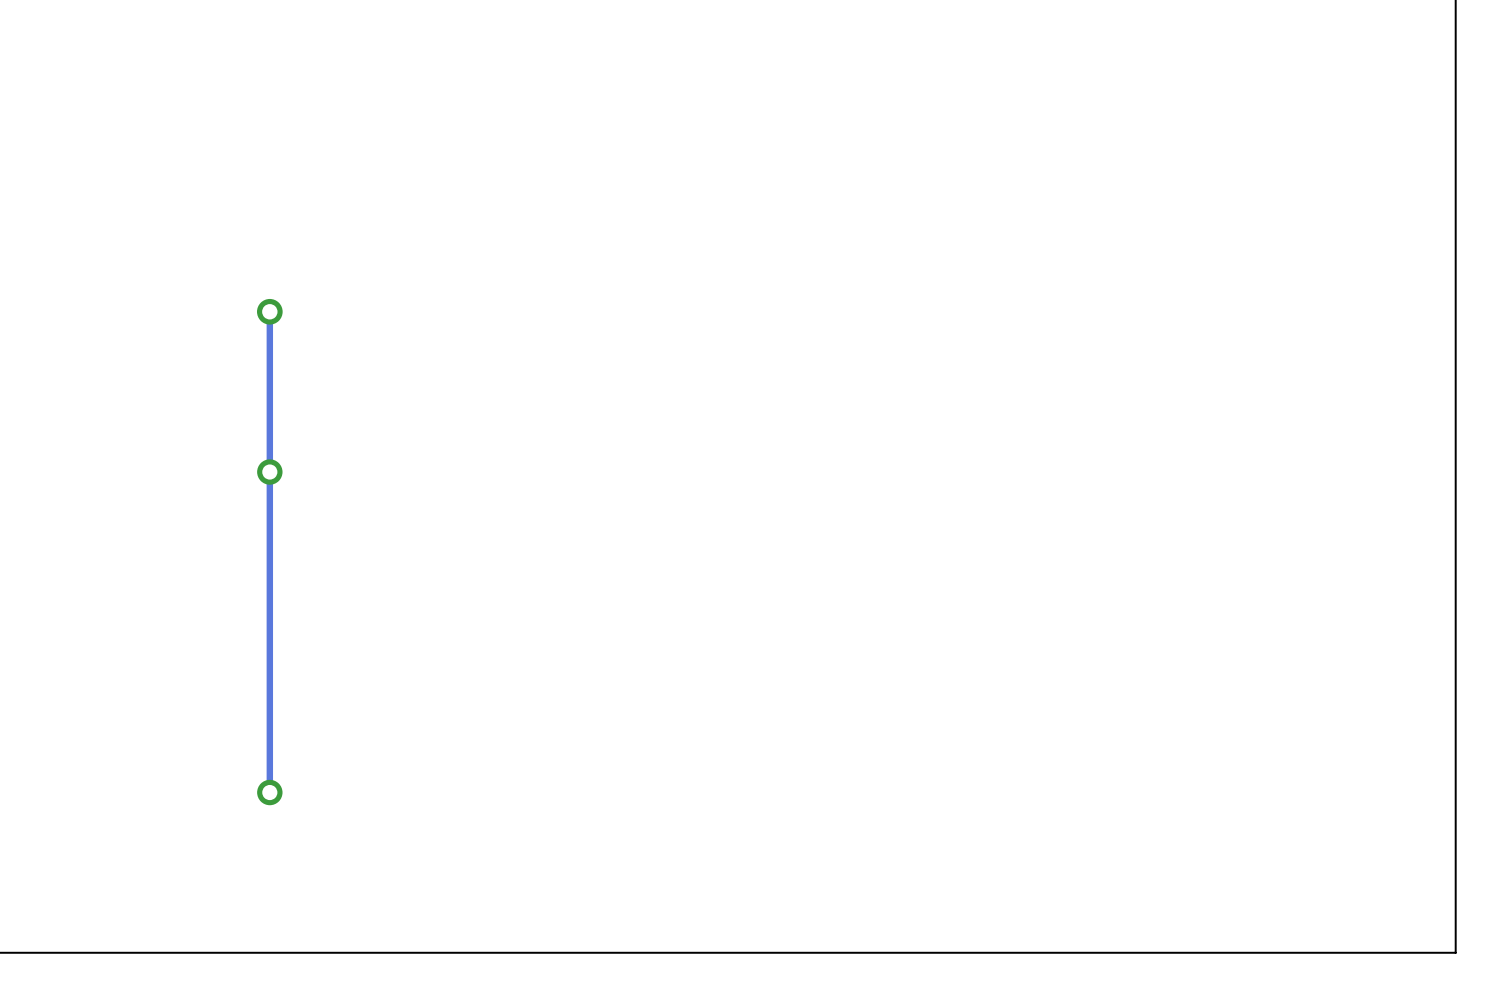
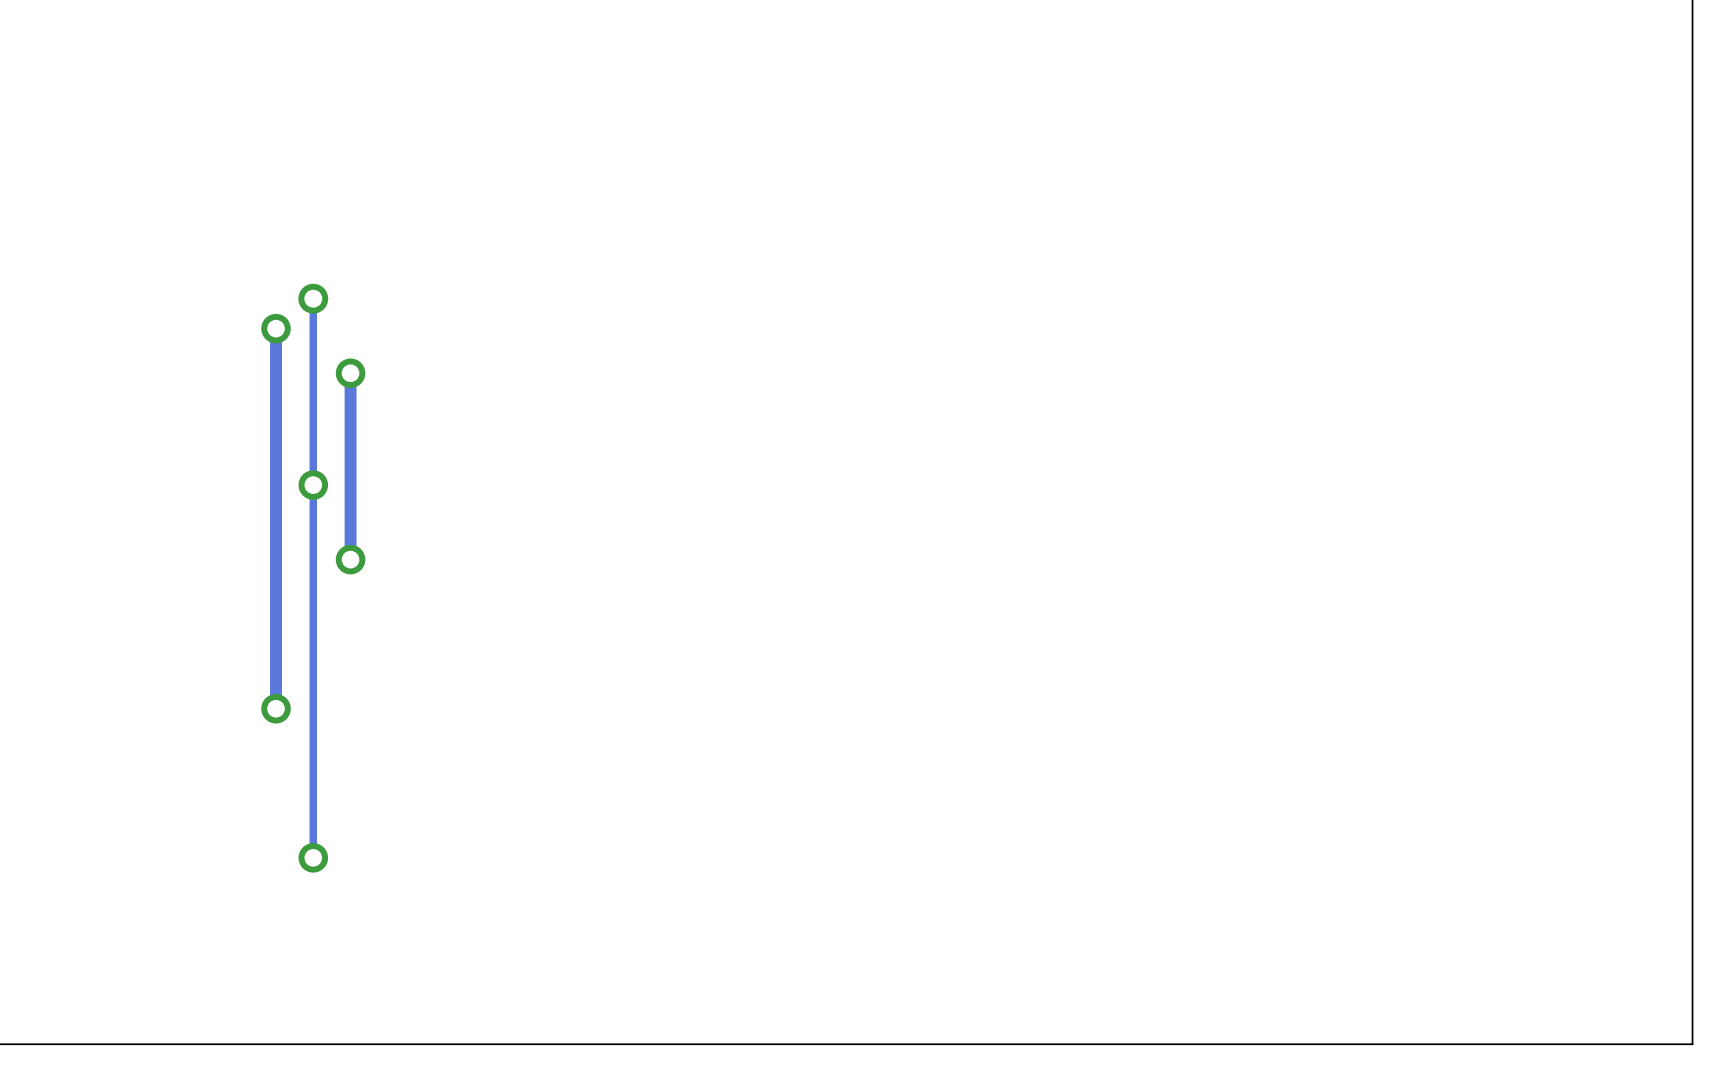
track: none -> (276, 328) (276, 708)
via: none -> (276, 328)
track: none -> (350, 373) (350, 559)
via: none -> (350, 373)
via: none -> (350, 559)
via: none -> (276, 708)

